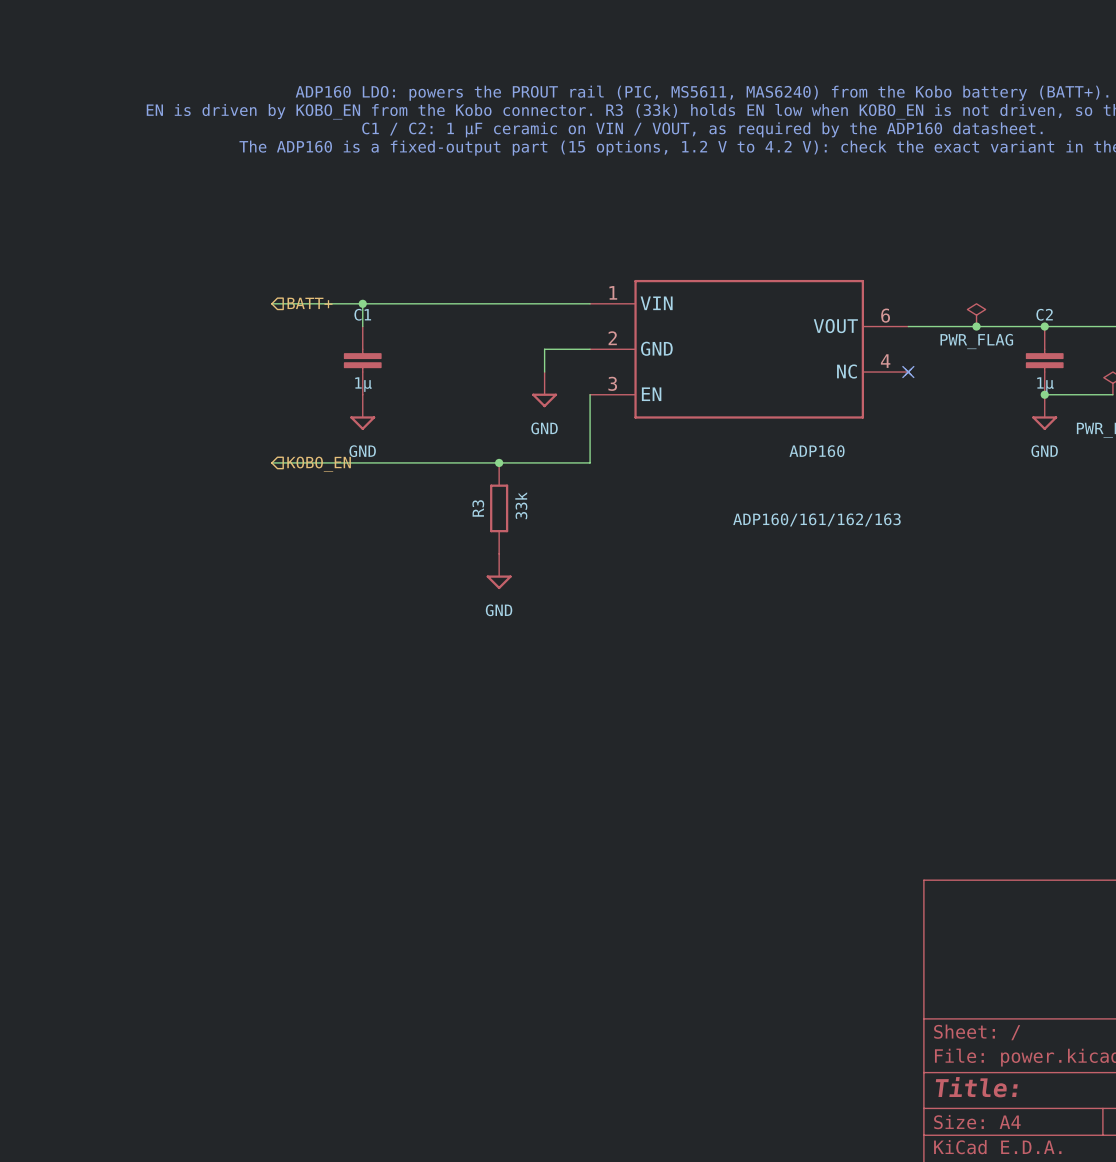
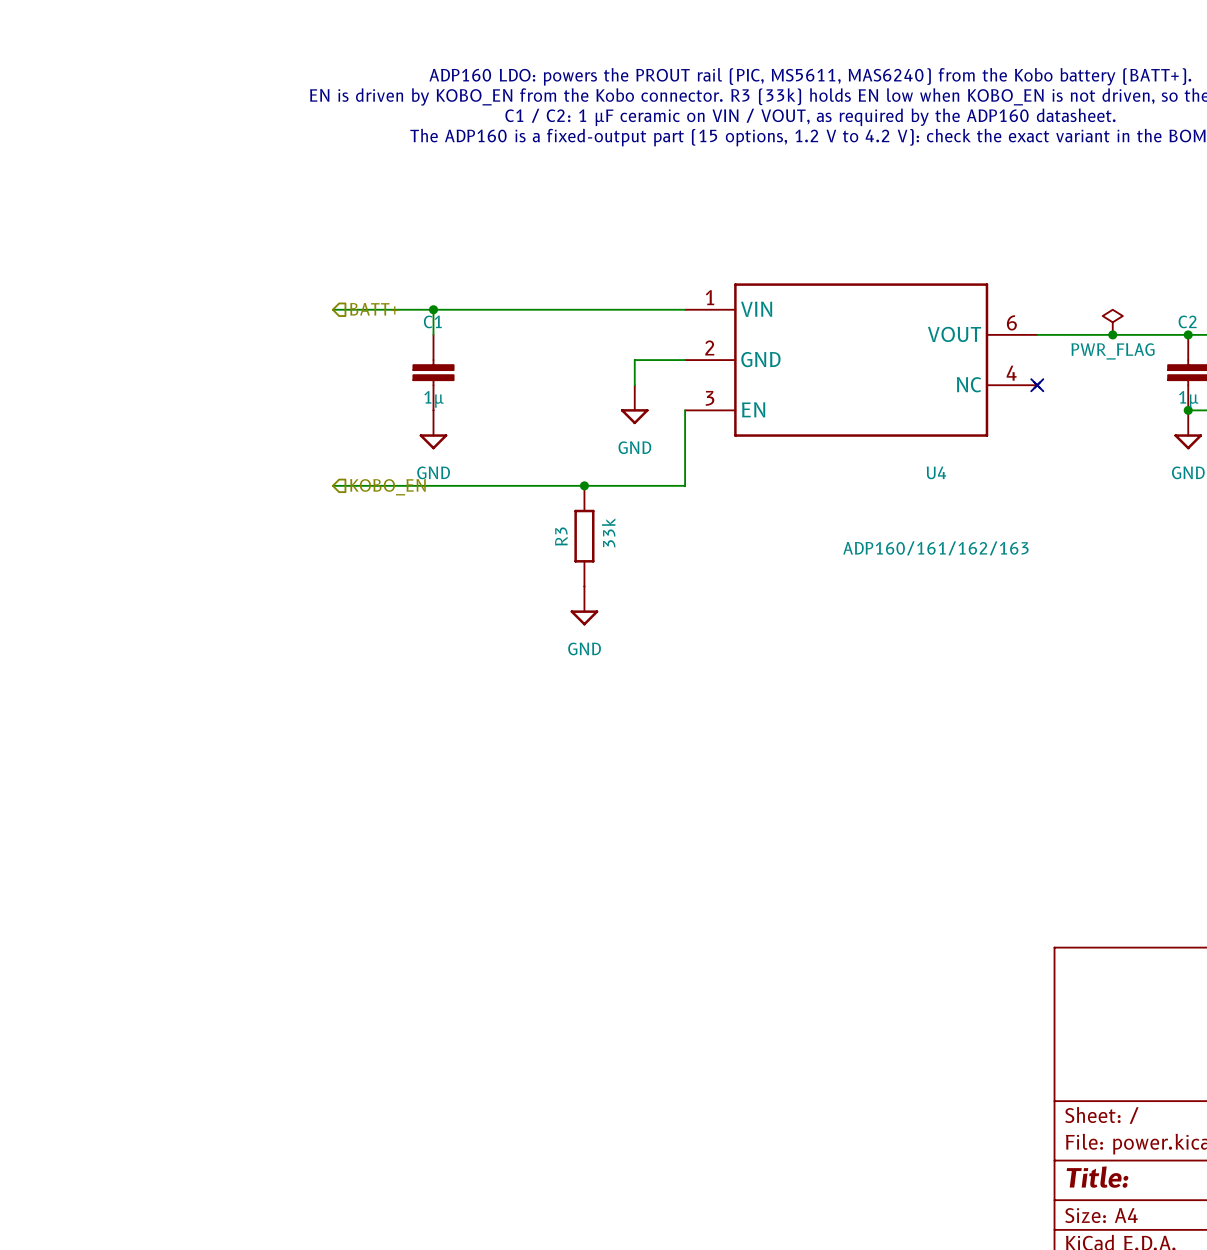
ADP160 name: ADP160 (817, 451) -> U4 (936, 472)

